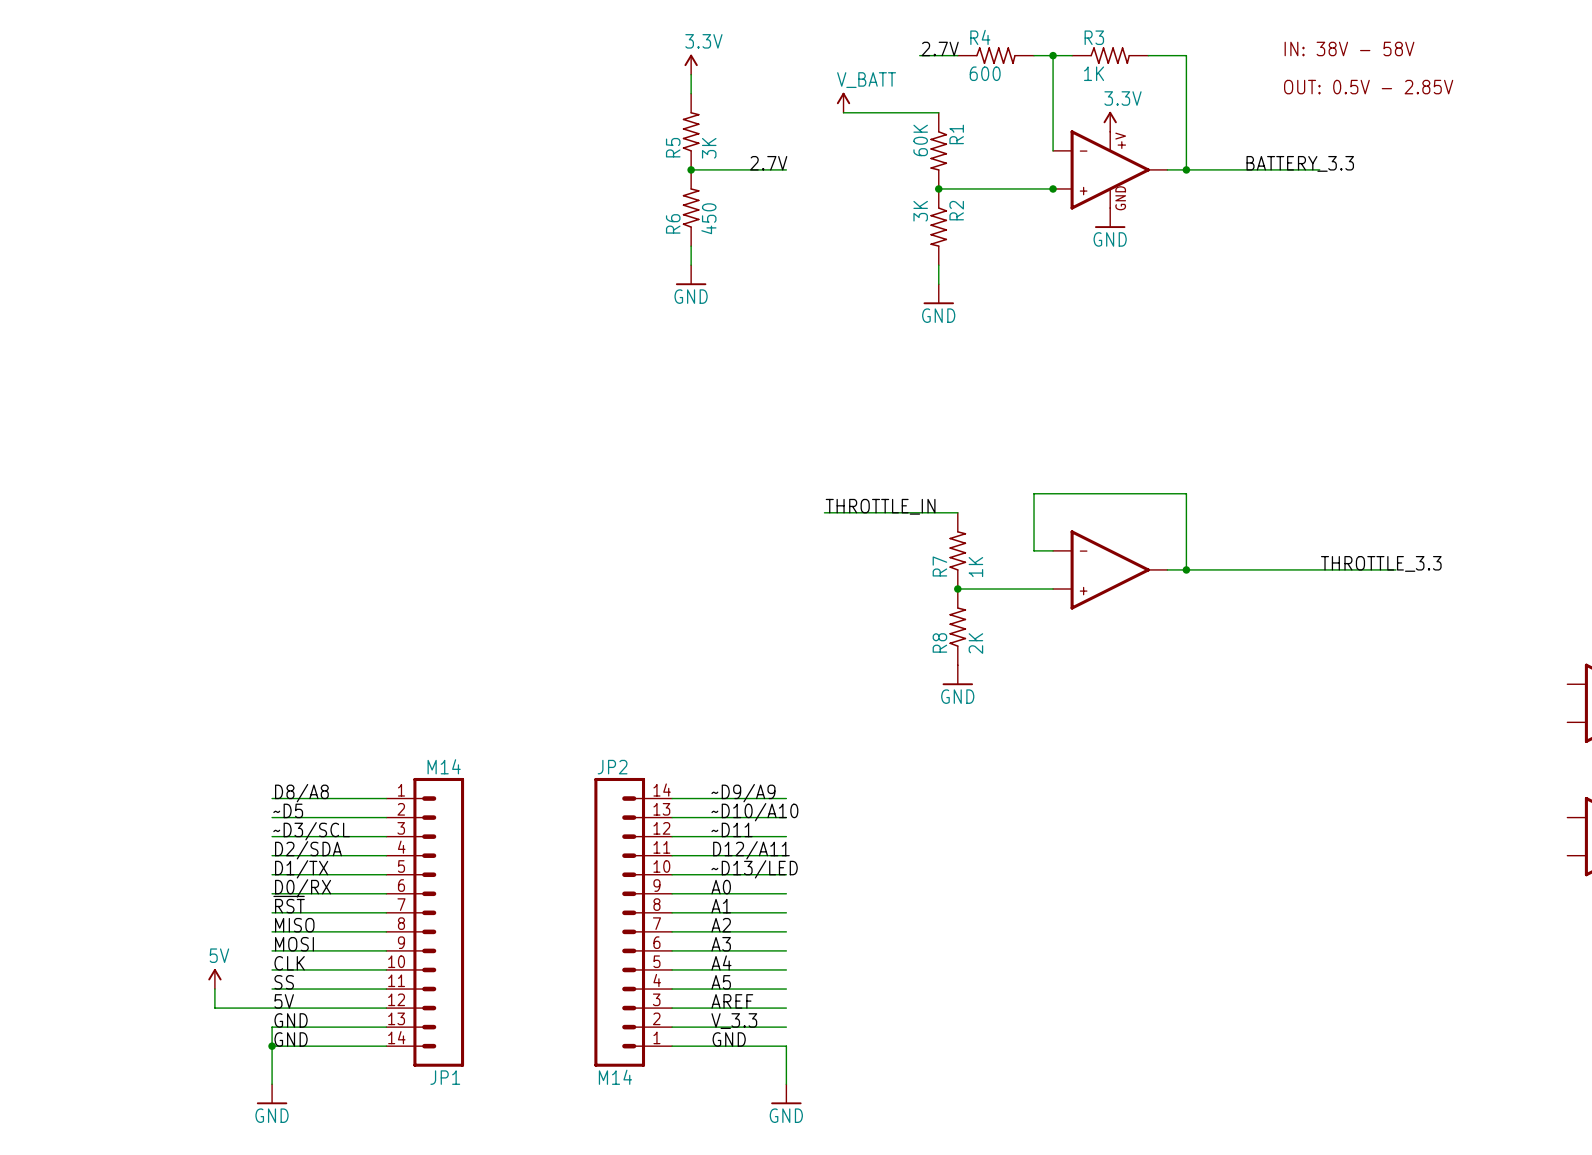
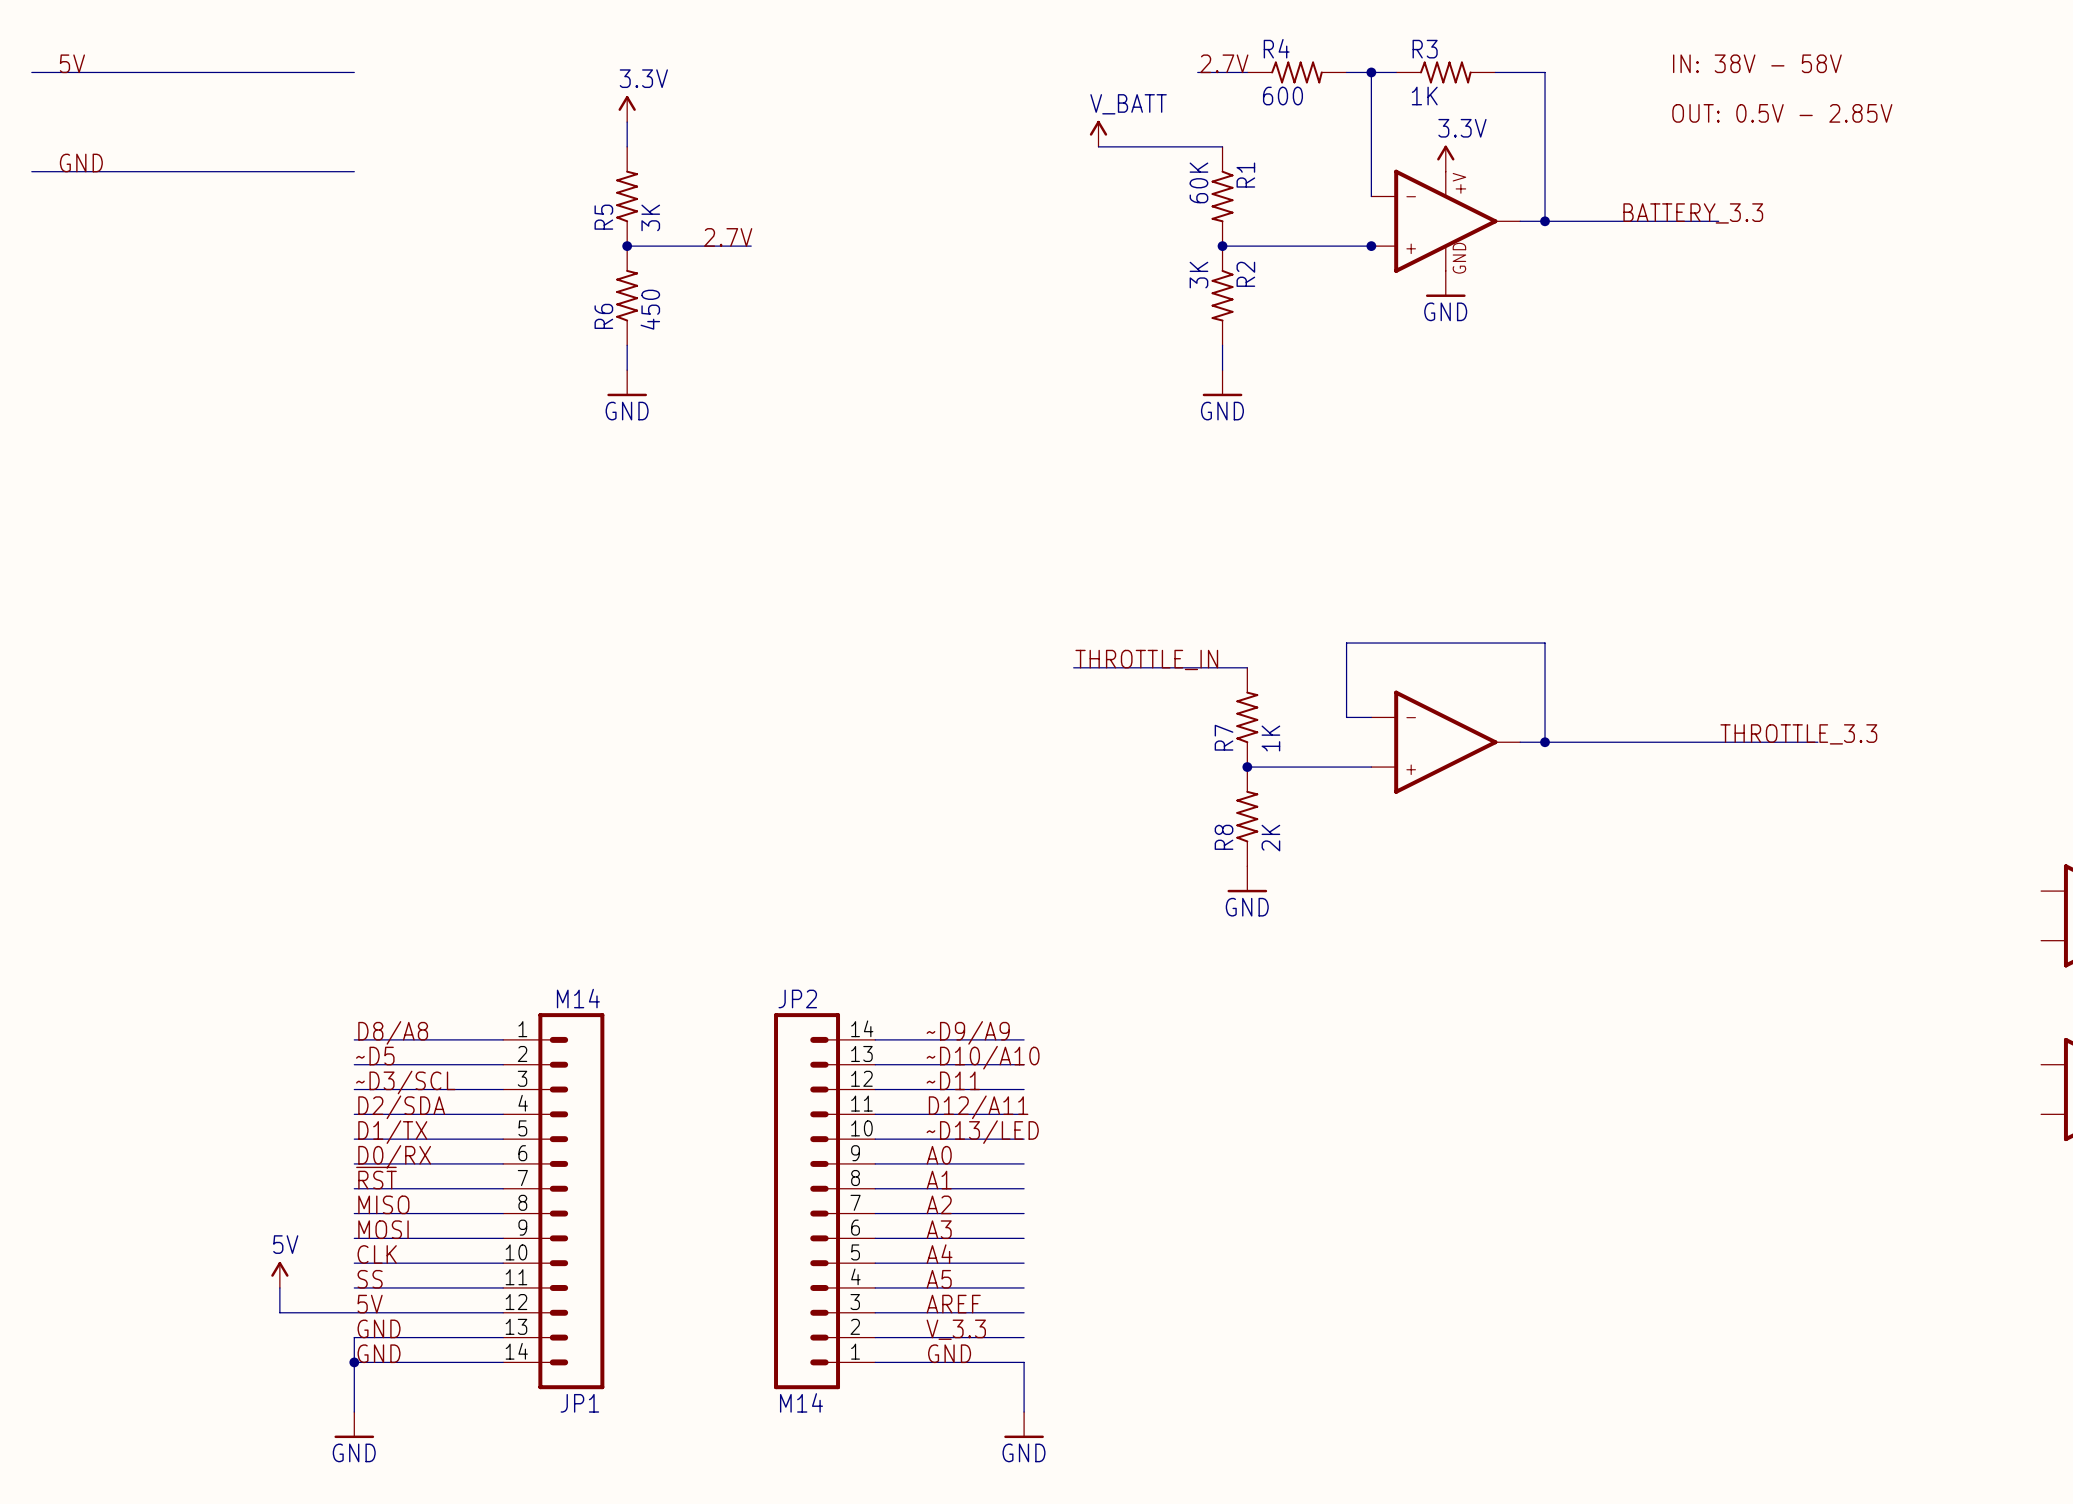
label: none -> 5V (72, 63)
wire: none -> (31, 72) (354, 72)
power symbol: 3.3V (691, 64) -> none
wire: (691, 74) (691, 93) -> none
power symbol: none -> 3.3V (627, 109)
wire: none -> (627, 122) (627, 146)
label: none -> GND (81, 163)
wire: none -> (31, 171) (354, 171)
R5 position: (691, 131) -> (627, 196)
label: 2.7V (768, 163) -> none
wire: (691, 169) (786, 169) -> none
junction: (691, 169) -> none
label: none -> 2.7V (728, 237)
wire: none -> (627, 246) (751, 246)
junction: none -> (627, 246)
R6 position: (691, 208) -> (627, 295)
wire: (691, 246) (691, 265) -> none
wire: none -> (627, 345) (627, 370)
power symbol: GND (691, 275) -> none
power symbol: none -> GND (627, 383)

